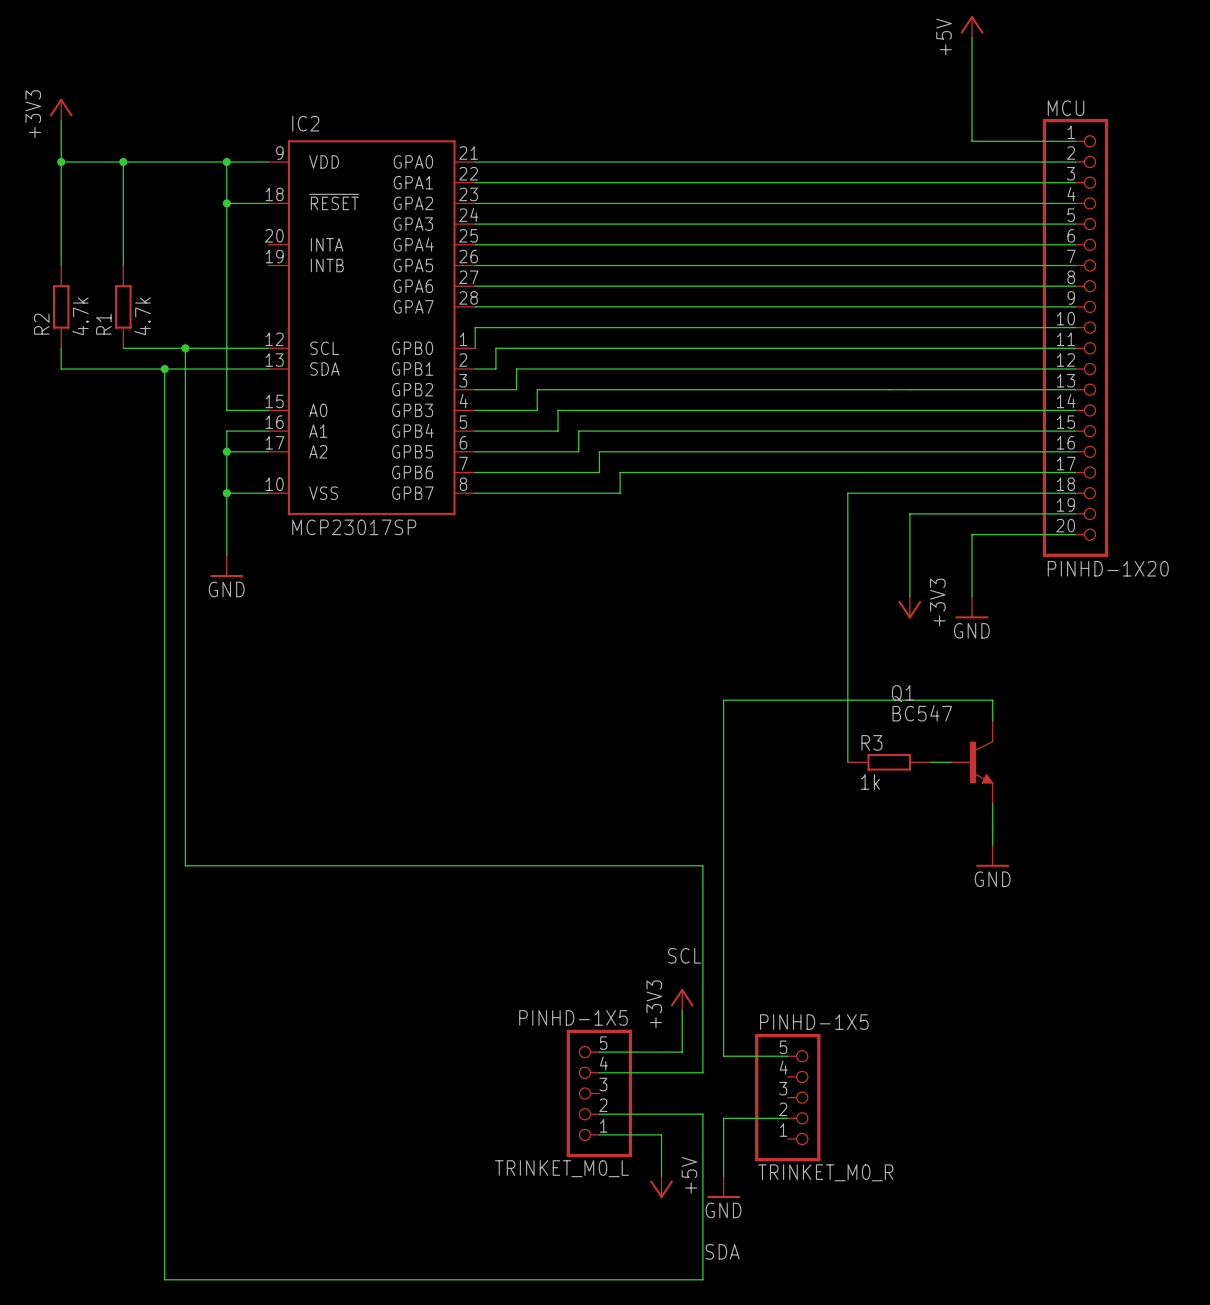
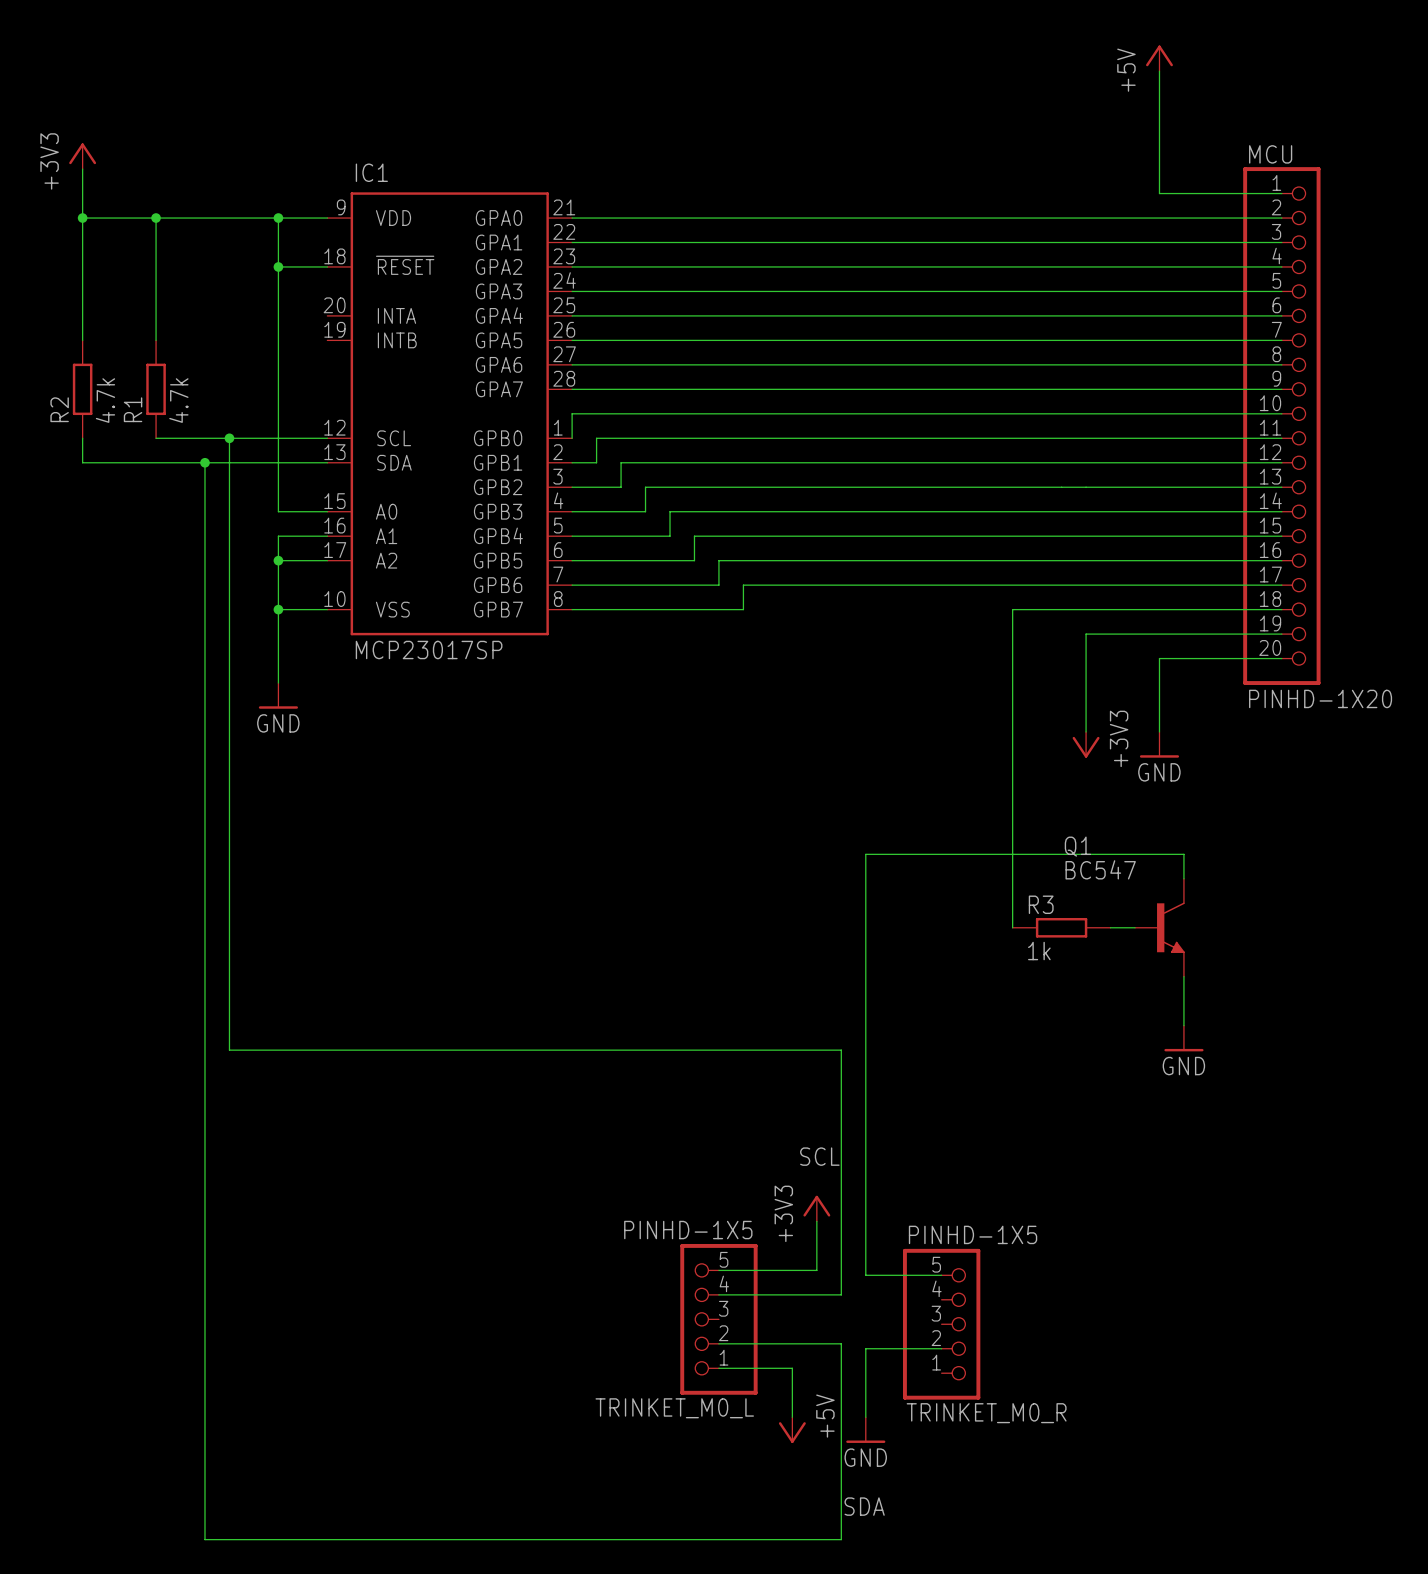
IC2 name: IC2 (305, 123) -> IC1 (371, 172)

